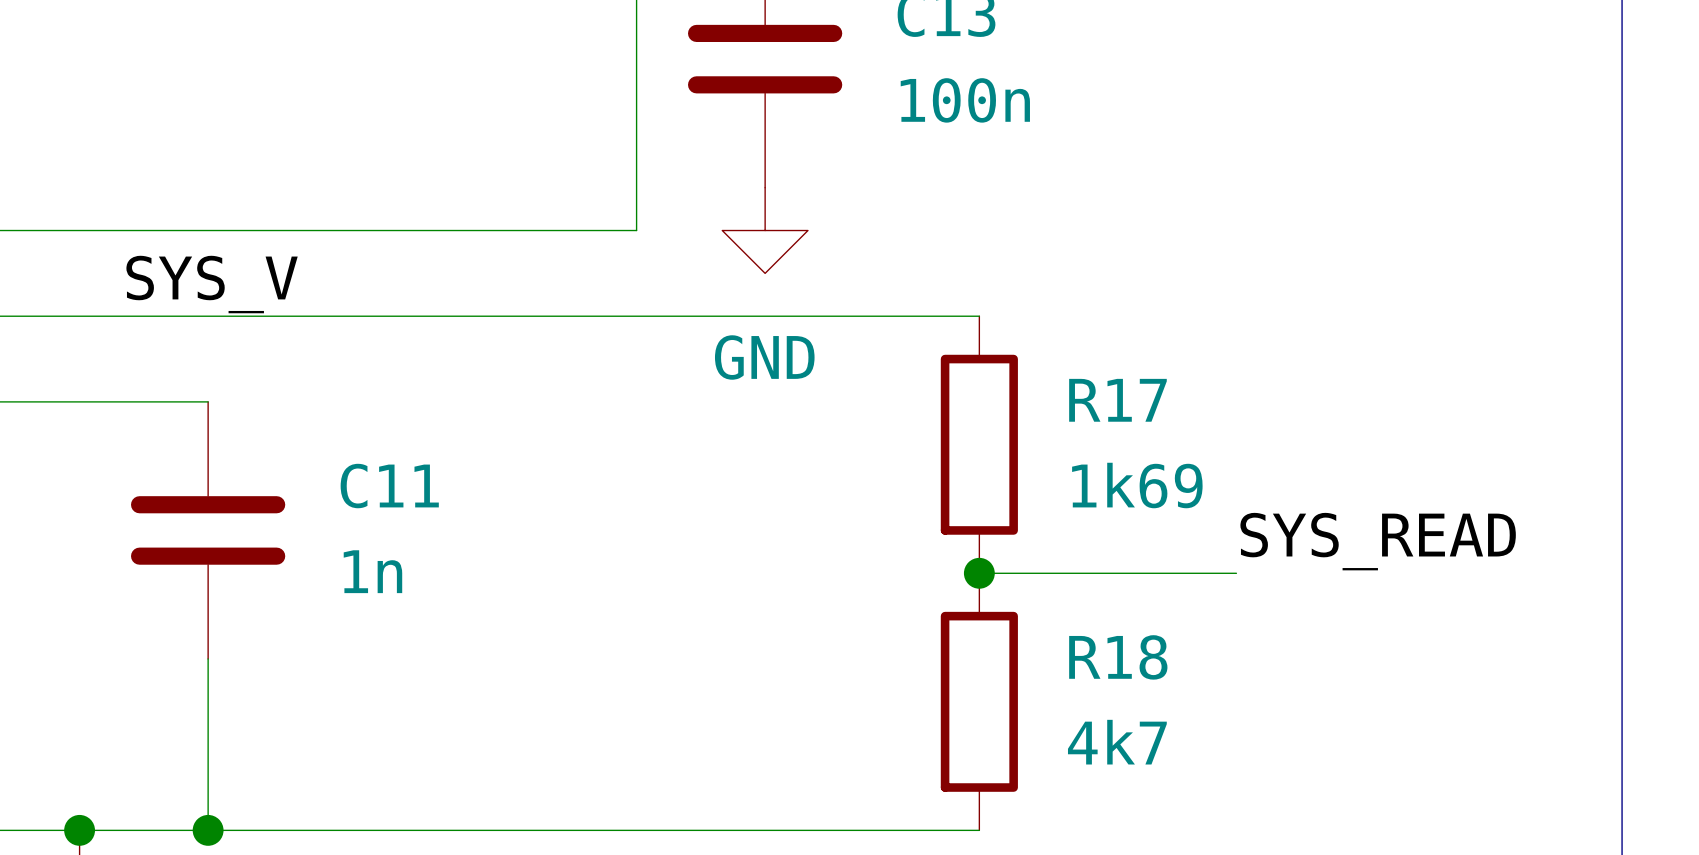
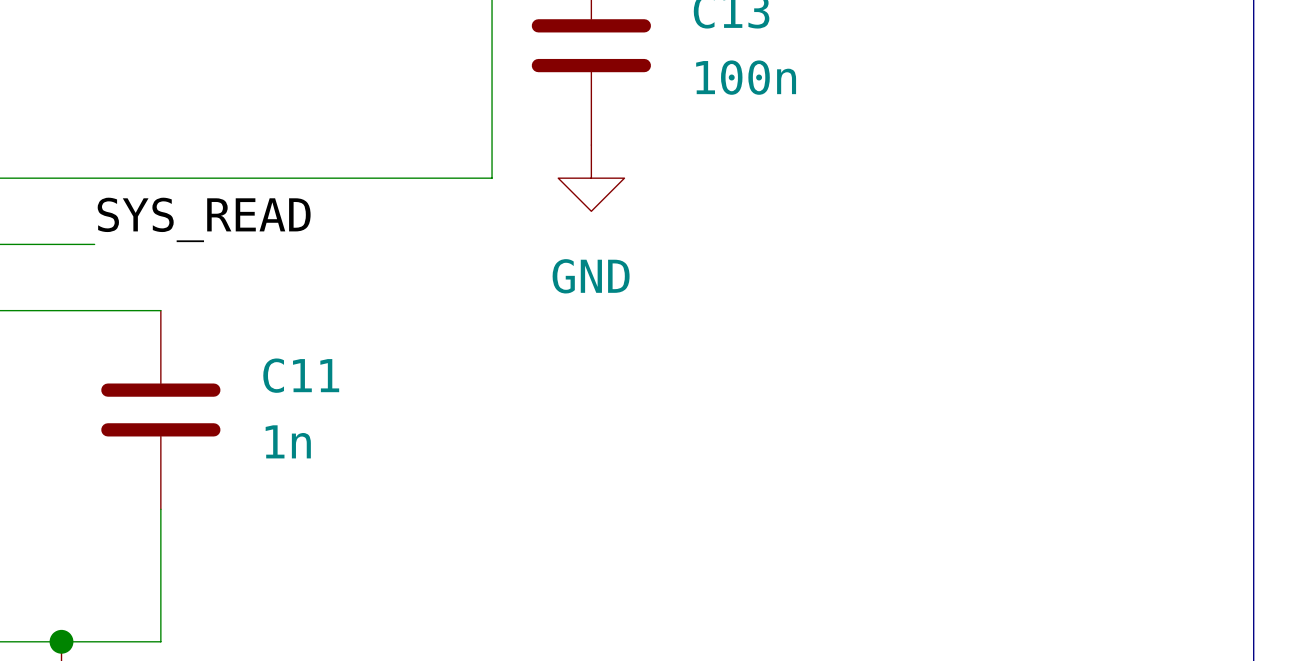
label: SYS_V (212, 284) -> SYS_READ (204, 219)
wire: (122, 316) (979, 316) -> none
R17: 1k69 (979, 444) -> none
label: SYS_READ (1378, 541) -> none
wire: (979, 573) (1236, 573) -> none
junction: (979, 573) -> none
R18: 4k7 (979, 701) -> none
wire: (208, 830) (979, 830) -> none
junction: (208, 830) -> none

